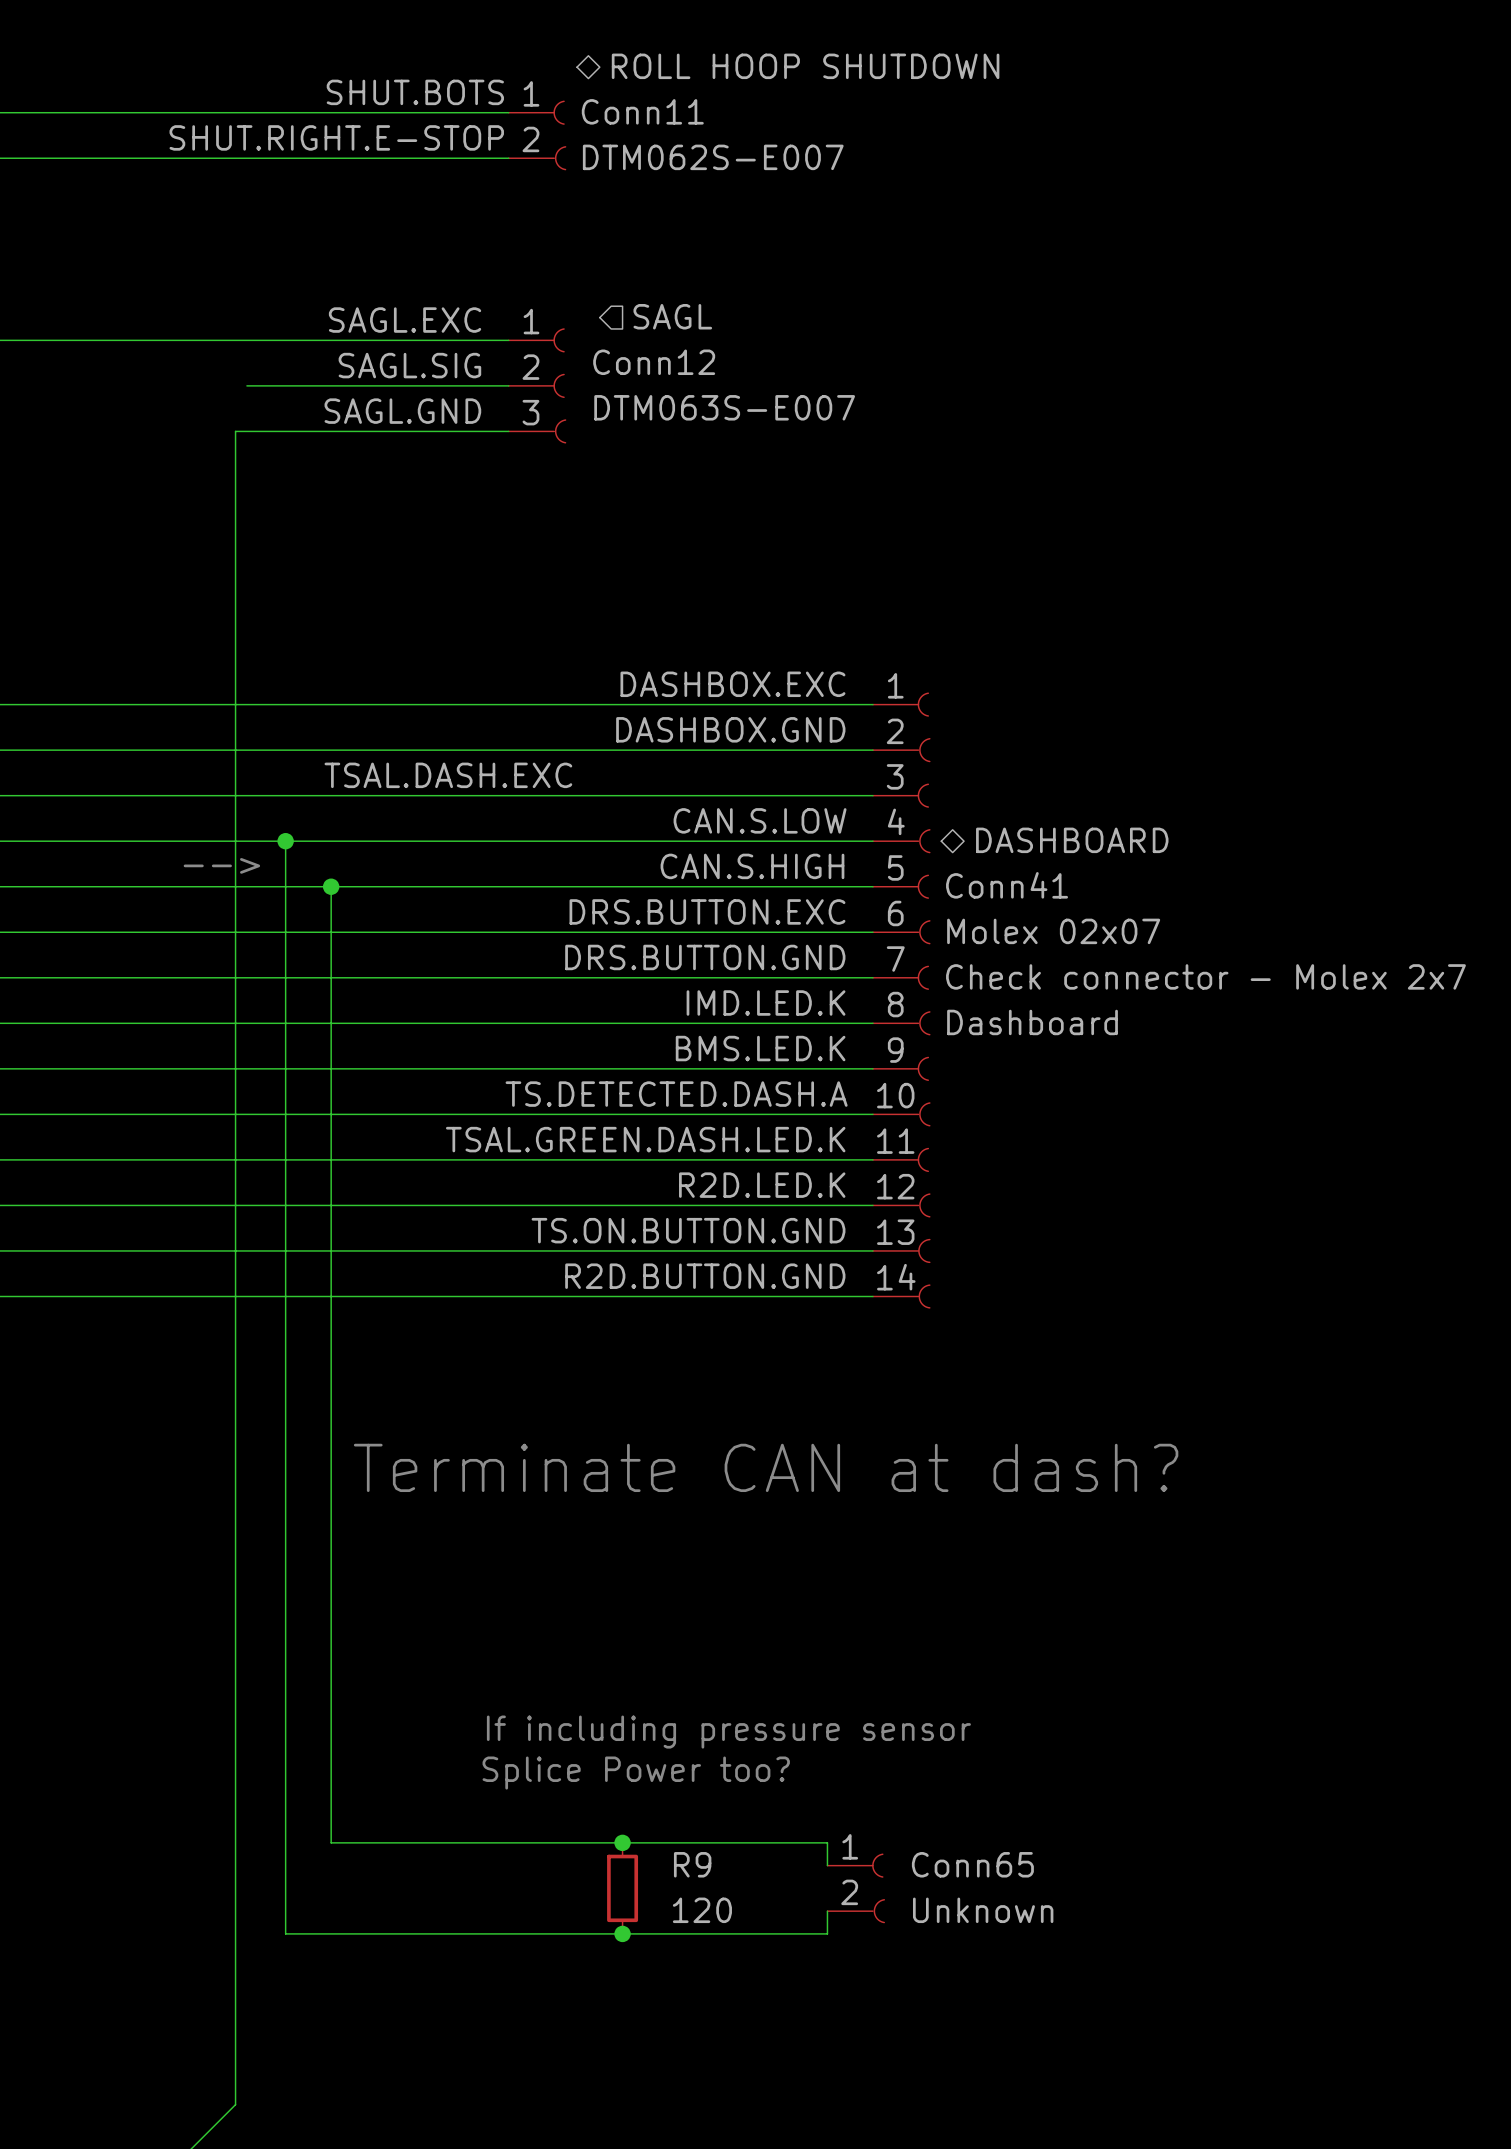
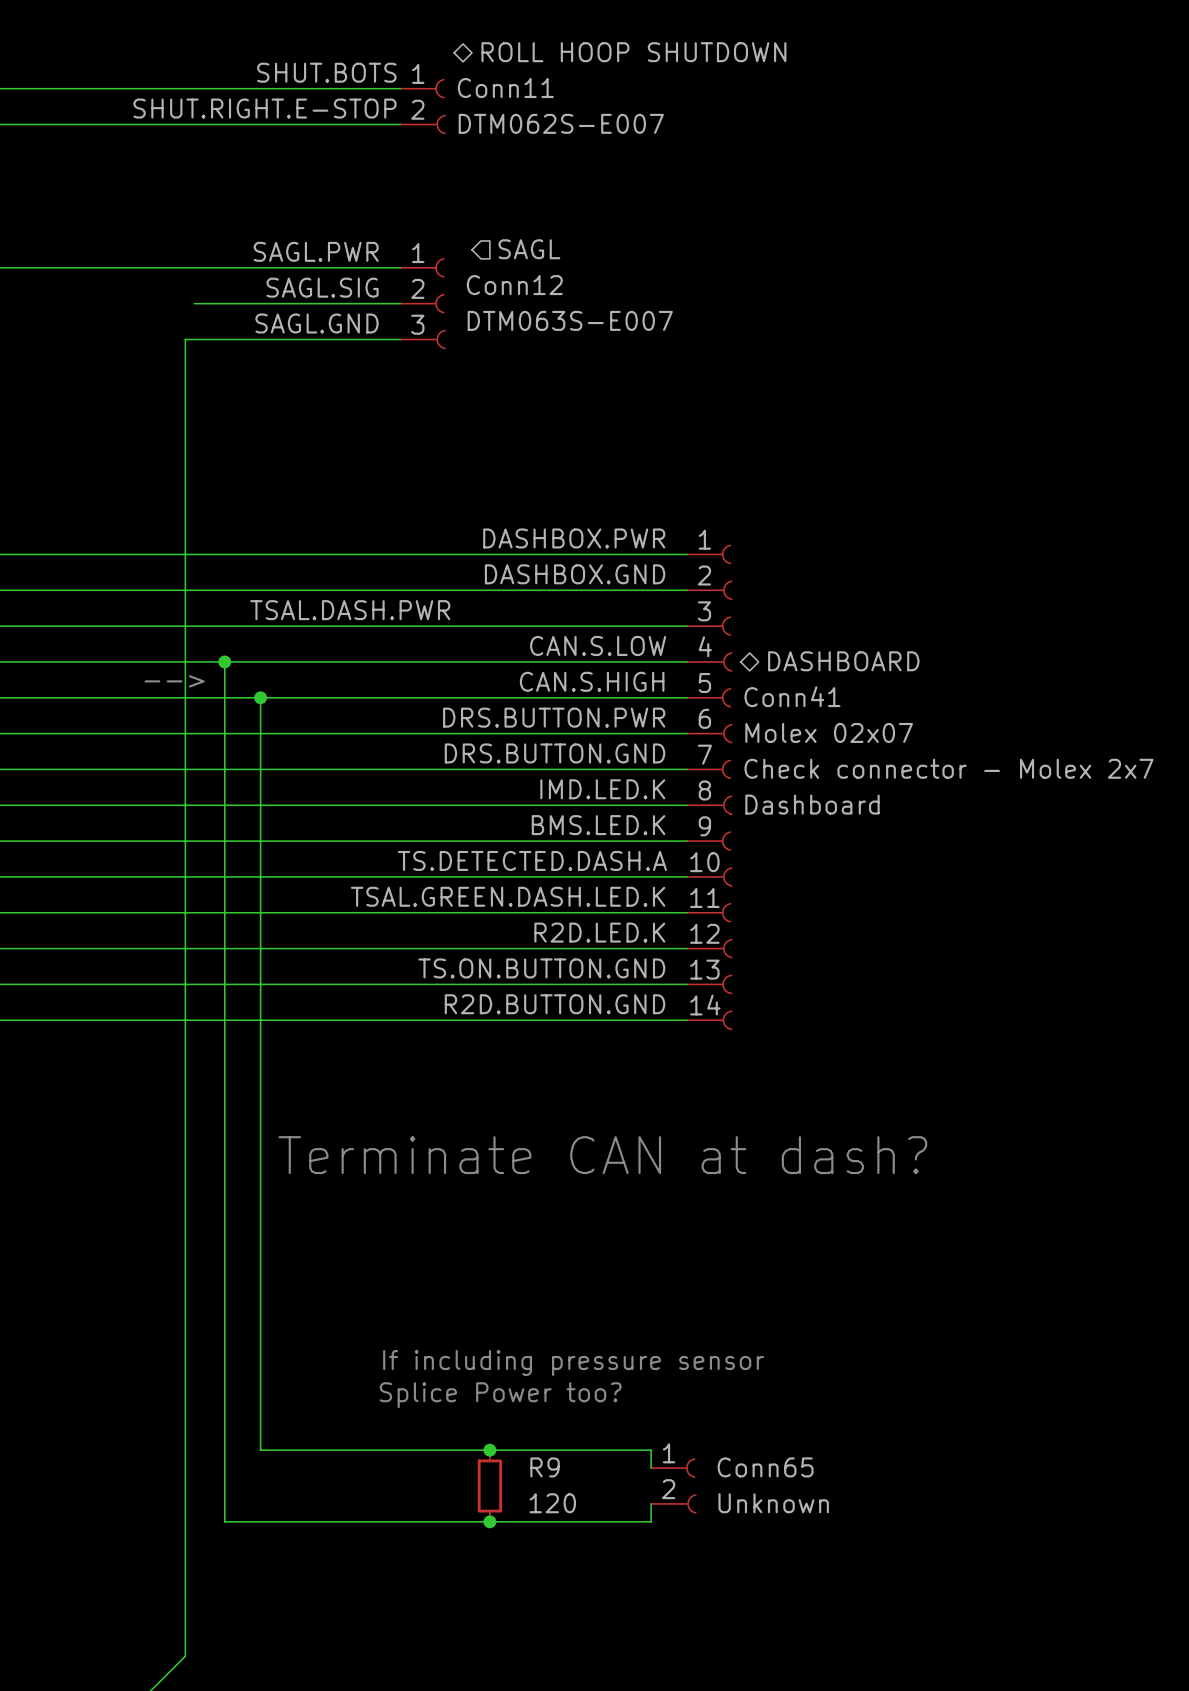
label: SAGL.EXC (405, 320) -> SAGL.PWR (316, 251)
label: DASHBOX.EXC (732, 684) -> DASHBOX.PWR (574, 538)
label: TSAL.DASH.EXC (448, 775) -> TSAL.DASH.PWR (350, 610)
label: DRS.BUTTON.EXC (707, 911) -> DRS.BUTTON.PWR (554, 717)

